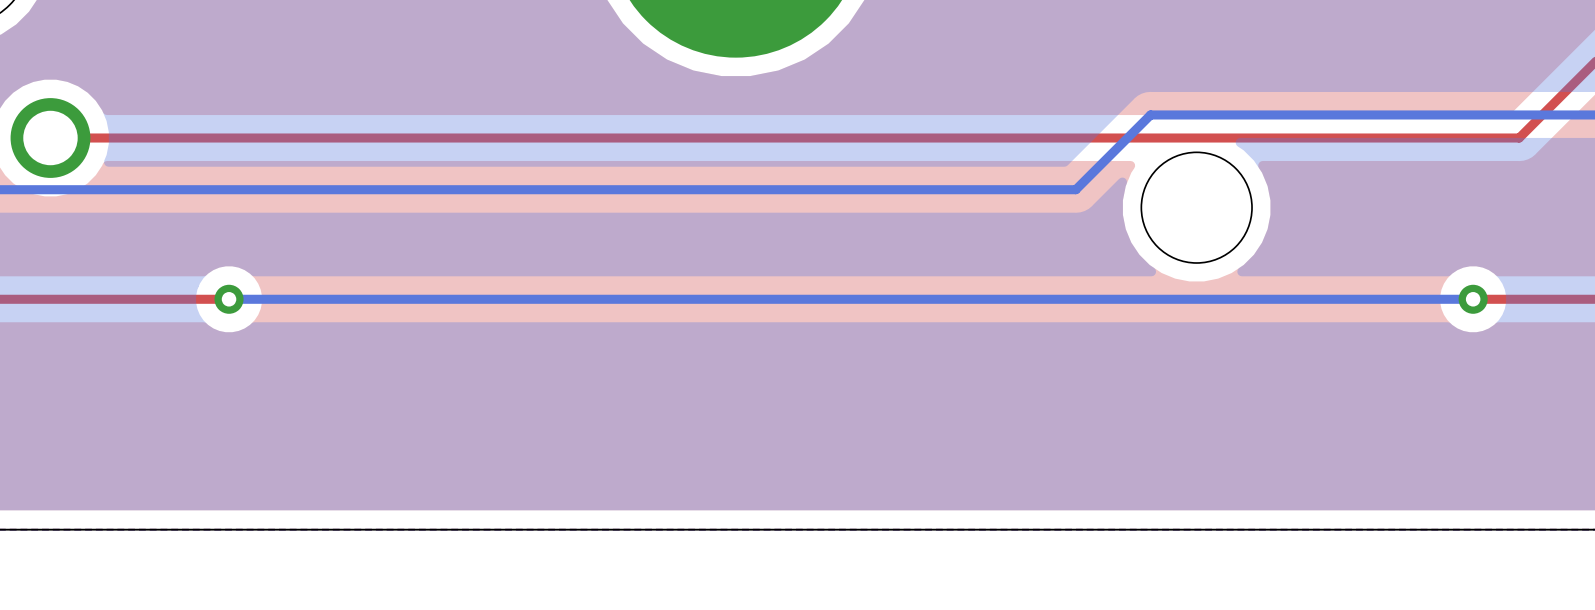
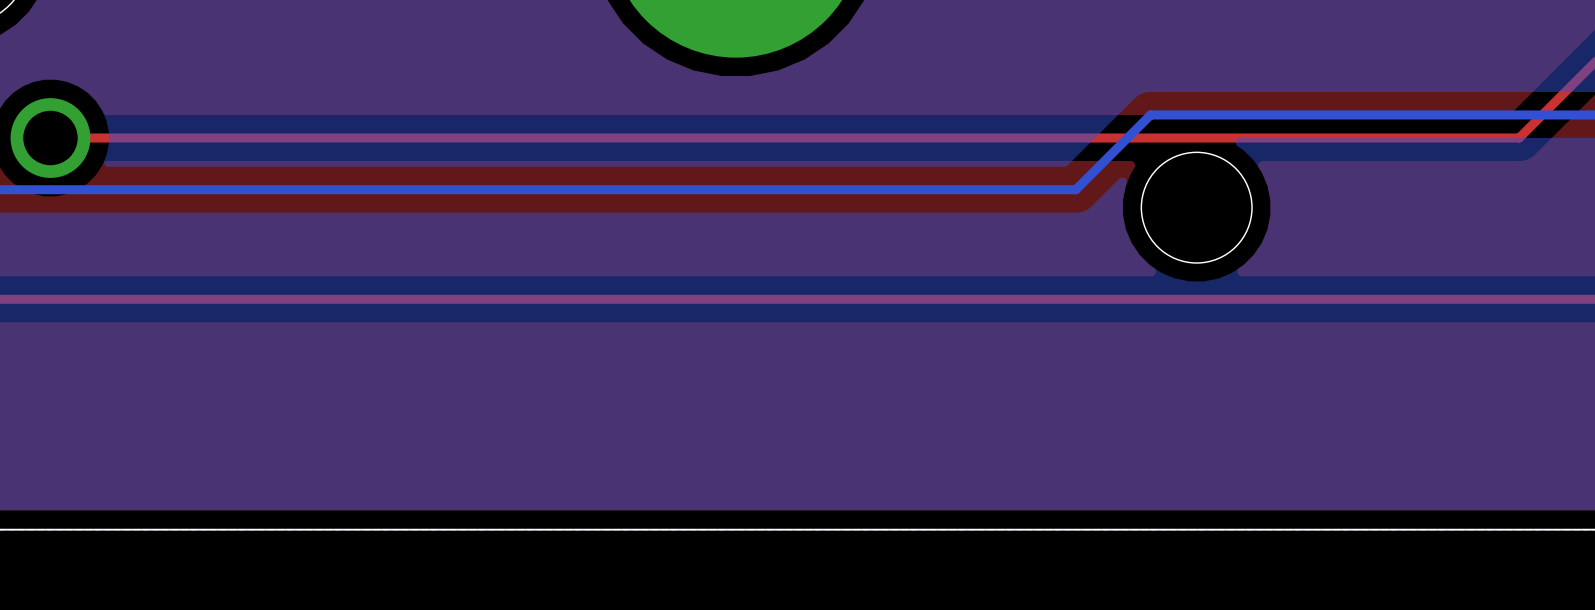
via: (229, 299) -> none
bottom track: (1473, 299) (229, 299) -> none
top track: none -> (1473, 299) (229, 299)
via: (1473, 299) -> none

